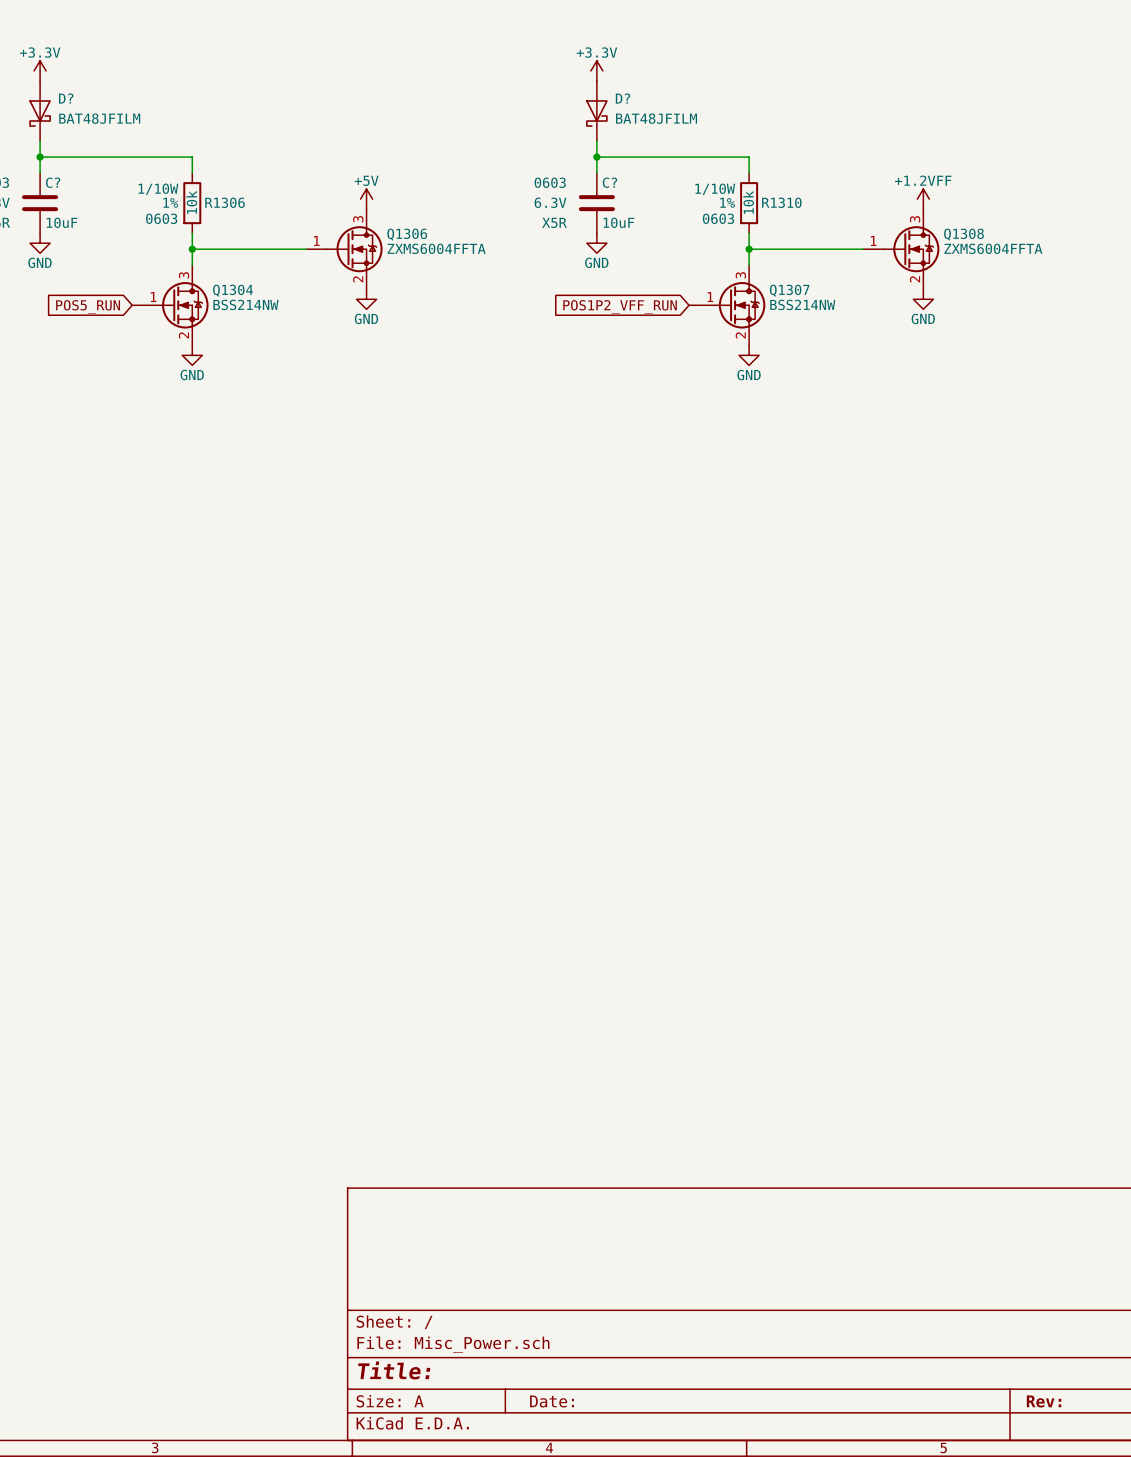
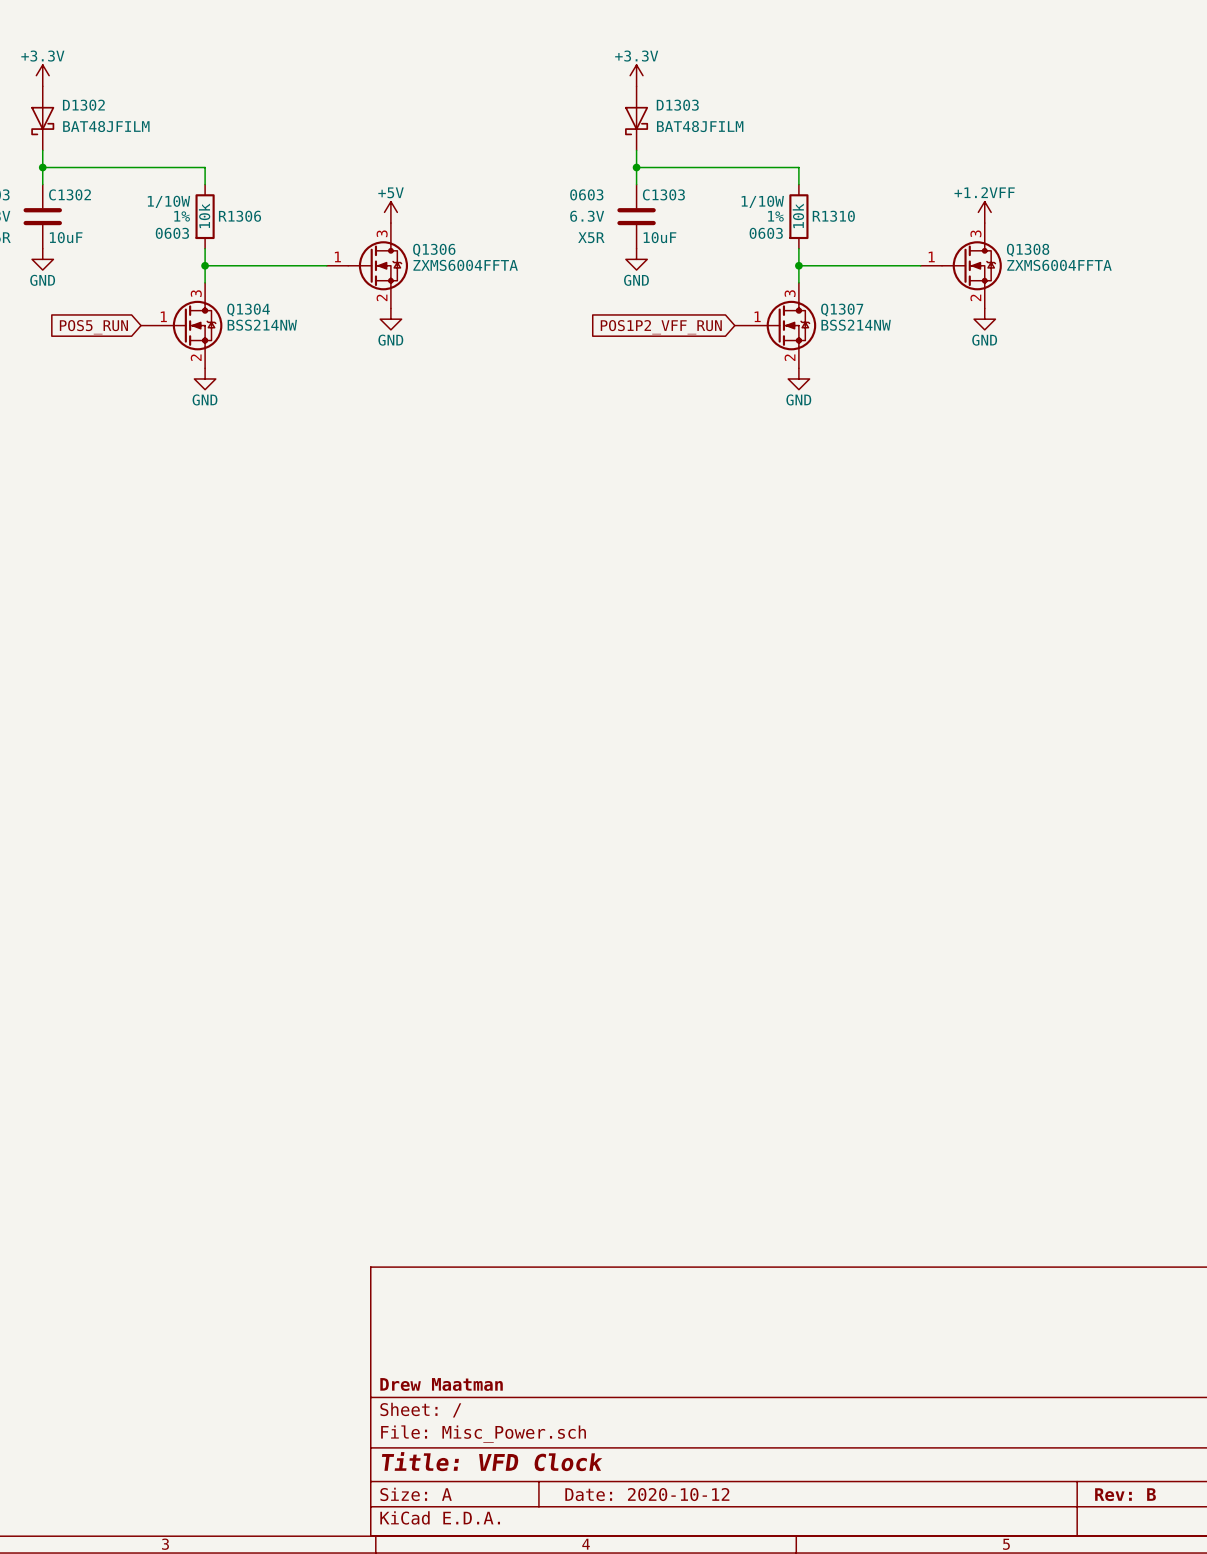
D? name: D? (66, 98) -> D1302 (83, 105)
D? name: D? (622, 98) -> D1303 (677, 105)
C? name: C? (53, 182) -> C1302 (70, 194)
C? name: C? (609, 182) -> C1303 (663, 194)
title block: none -> Drew Maatman (441, 1384)
title block: Title: (394, 1370) -> Title: VFD Clock (492, 1461)
title block: Date: (552, 1401) -> Date: 2020-10-12 (647, 1494)
title block: Rev: (1044, 1401) -> Rev: B (1125, 1494)

